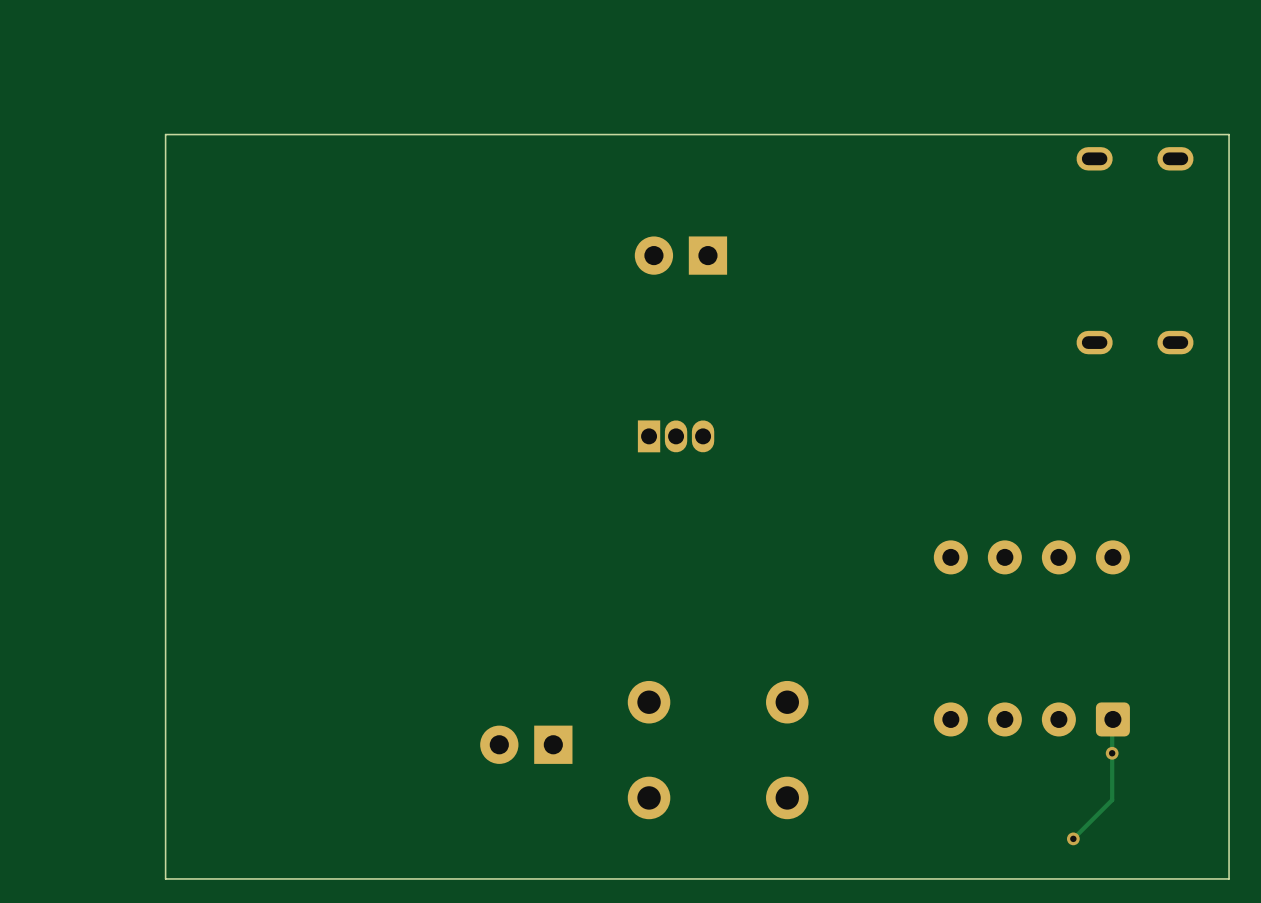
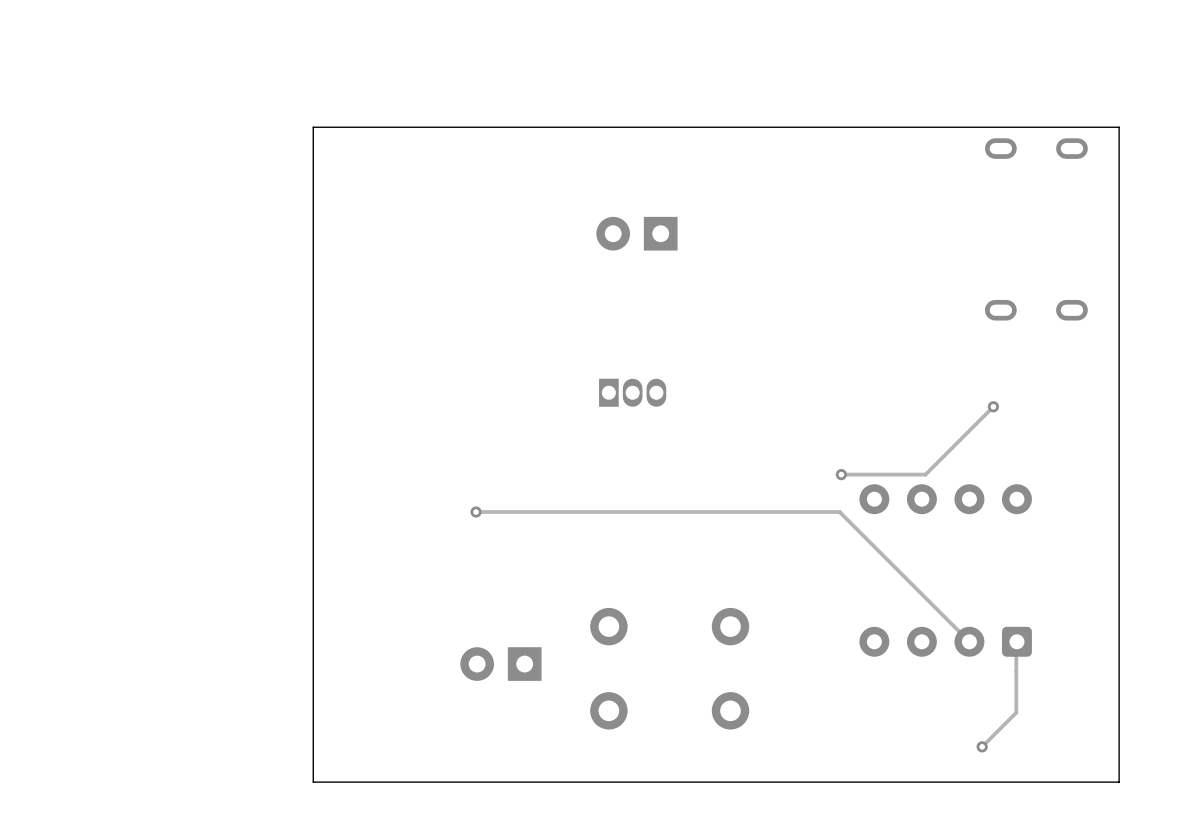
board edge: (313, 134) (165, 134) (165, 878) (313, 878) -> (313, 127) (313, 782)
track: none -> (993, 406) (925, 474) (841, 474)
via: none -> (993, 406)
via: none -> (841, 474)
track: none -> (476, 512) (839, 512) (969, 641)
via: none -> (476, 512)
via: (1112, 753) -> none

